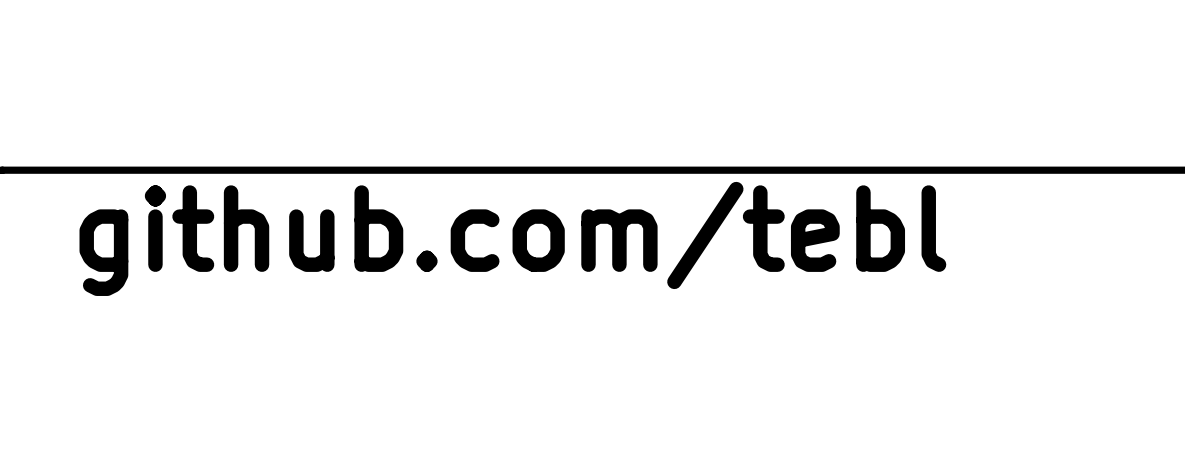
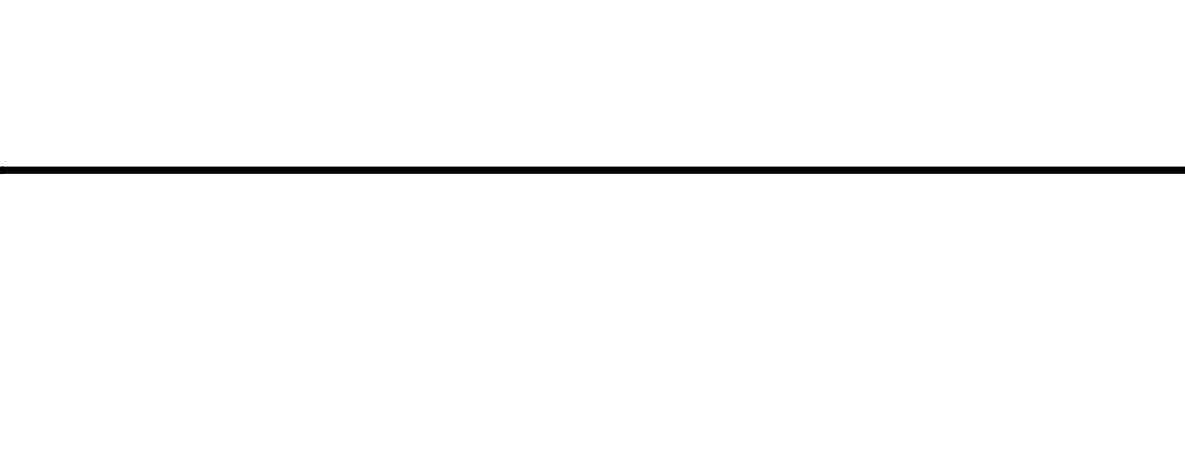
text: github.com/tebl (512, 238) -> none

